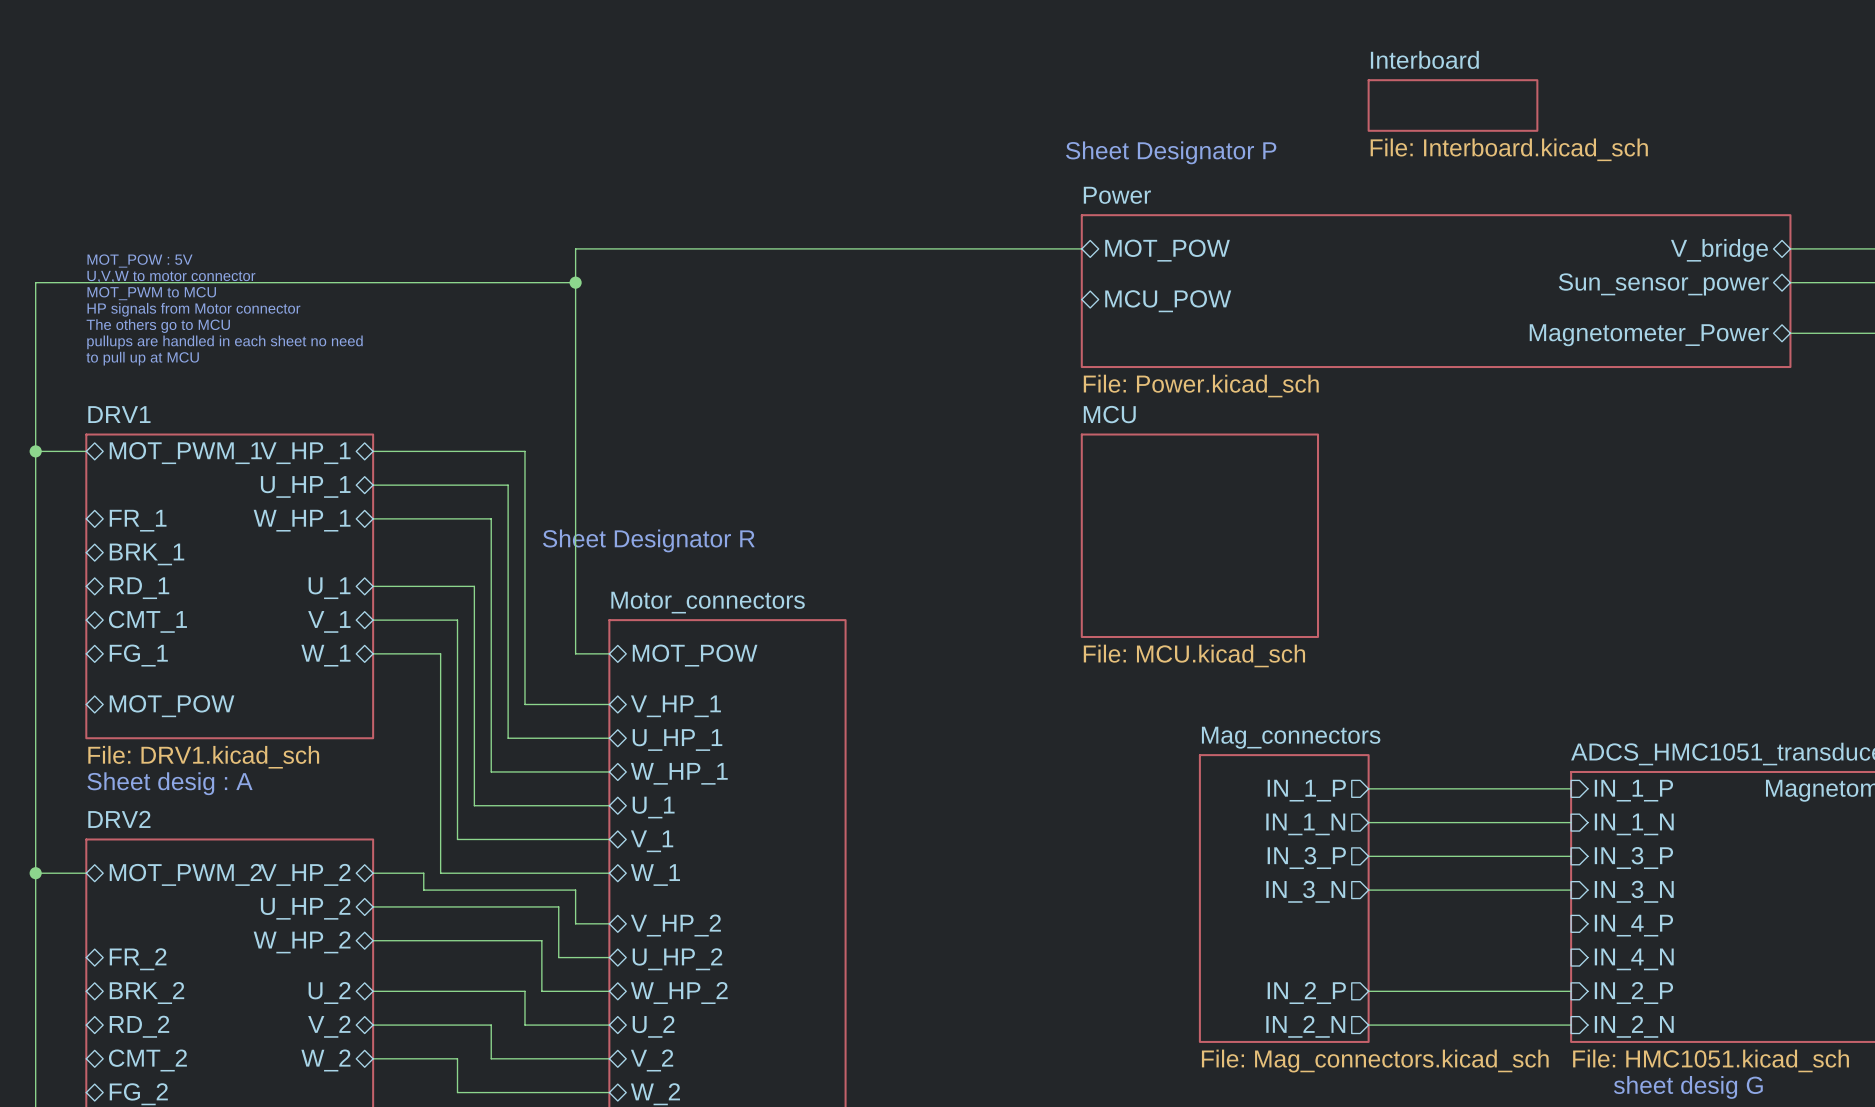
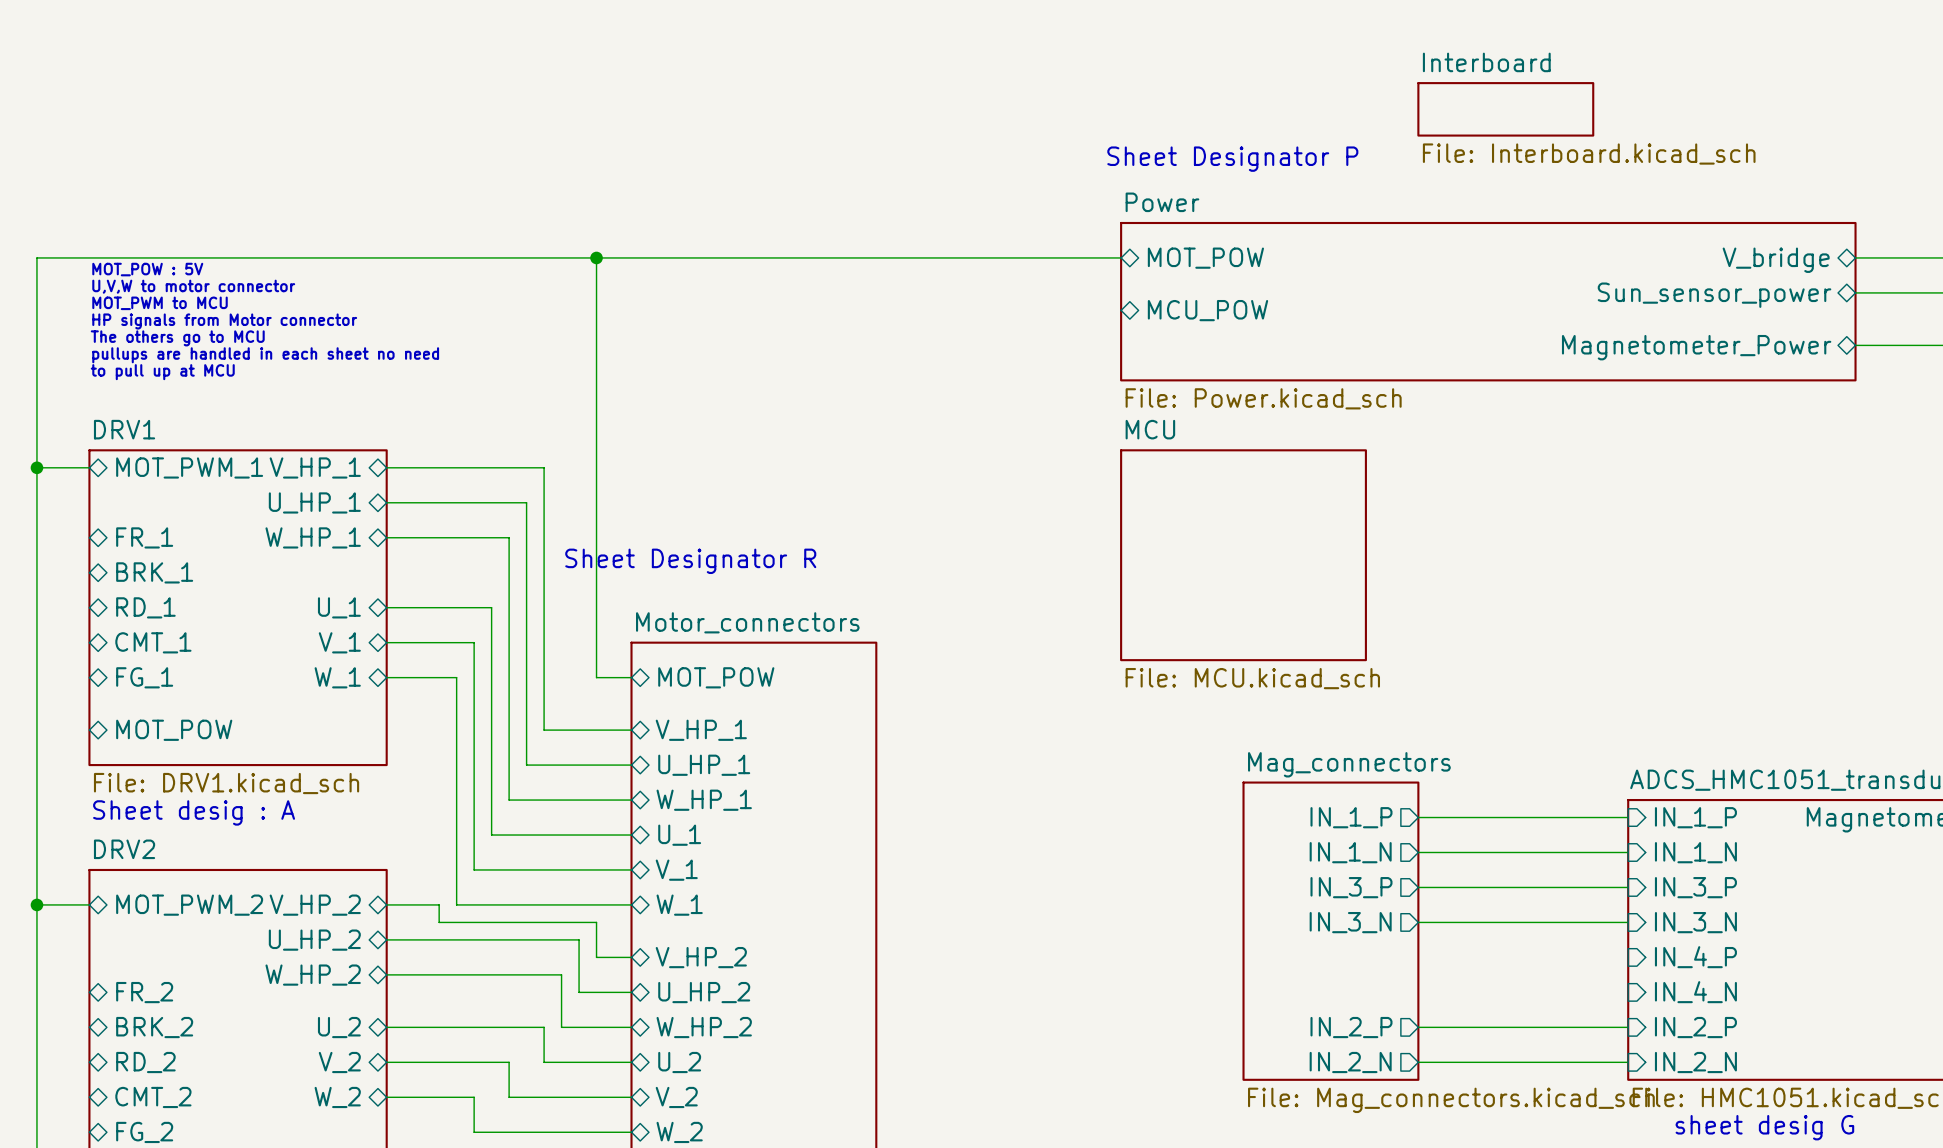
wire: (35, 282) (575, 282) -> (36, 292) (36, 257) (596, 257)
junction position: (575, 282) -> (596, 257)

